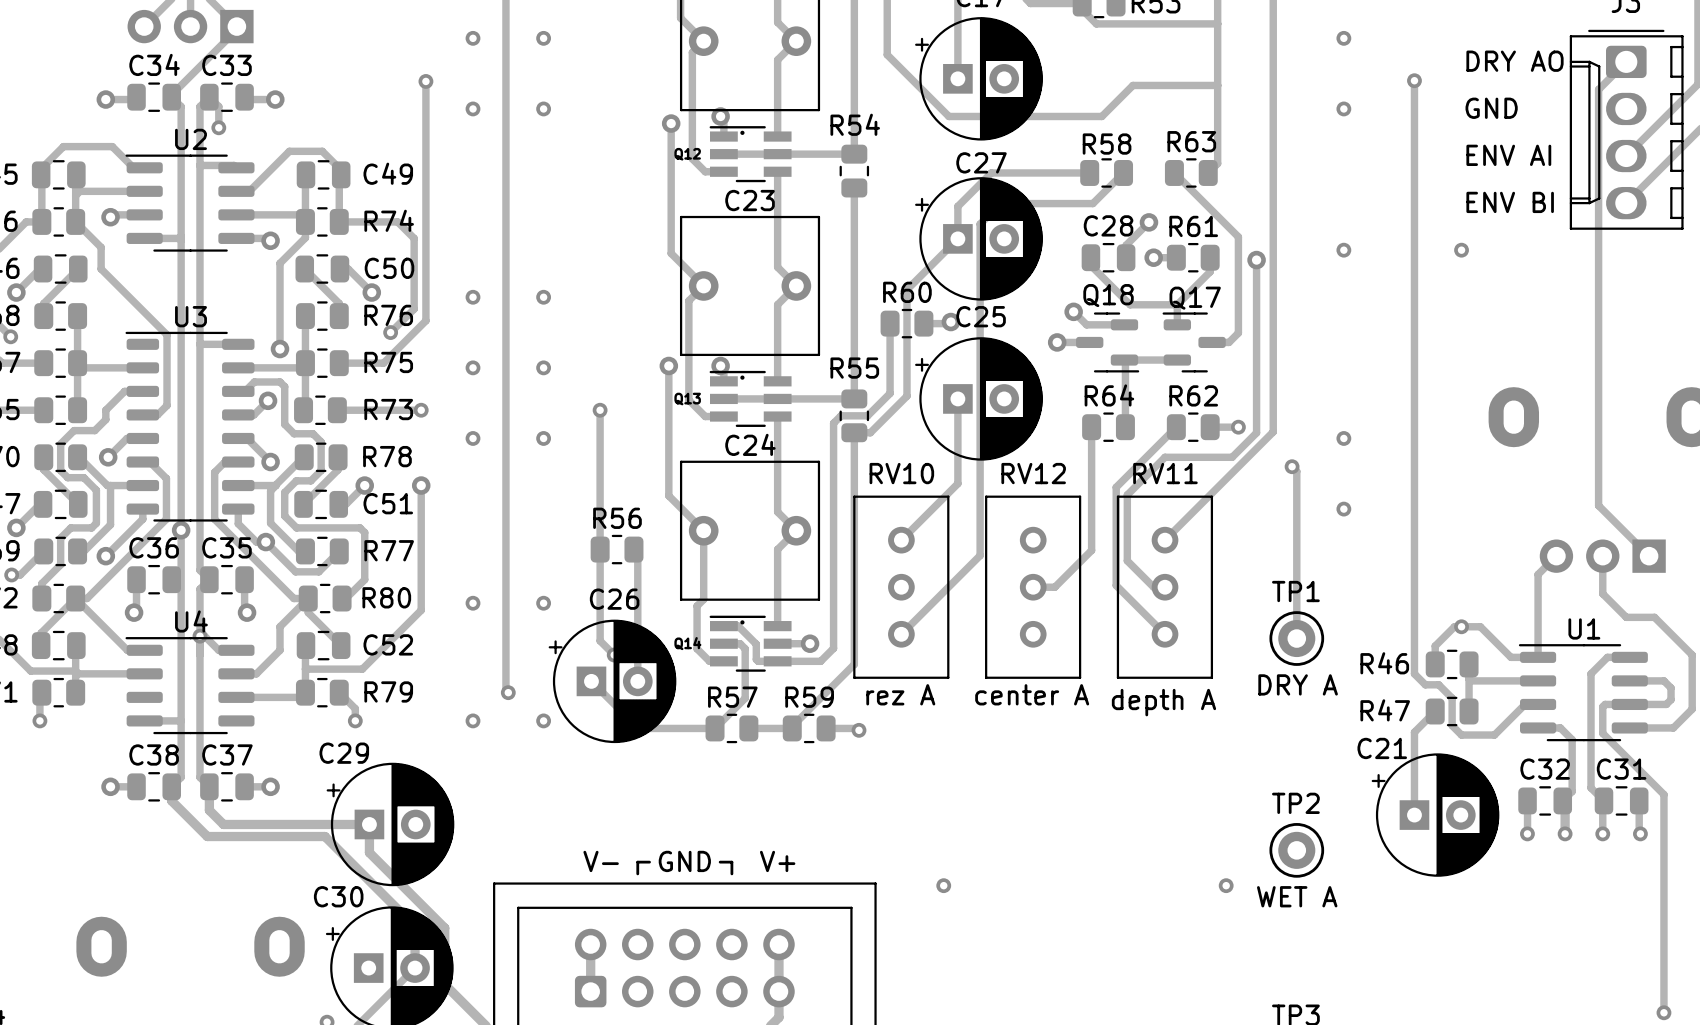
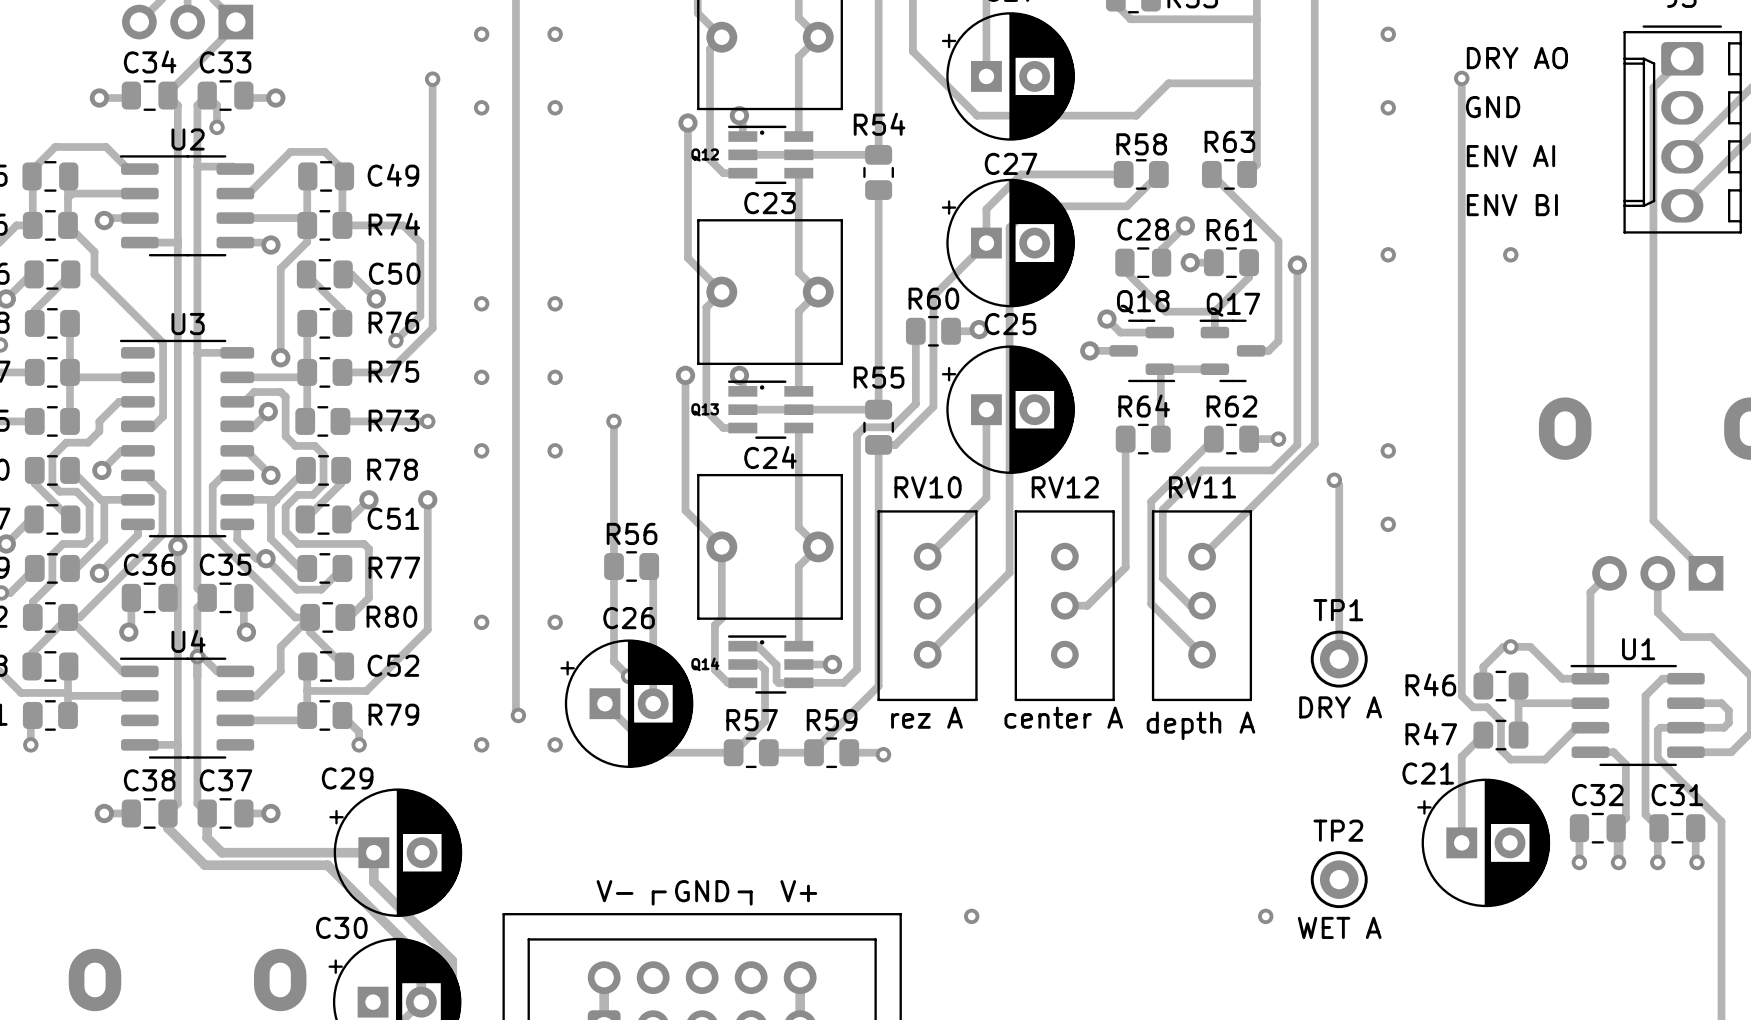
text position: DRY AO (1515, 61) -> DRY AO (1517, 58)
text position: GND (1491, 108) -> GND (1493, 107)
text position: ENV AI (1508, 155) -> ENV AI (1510, 156)
text position: ENV BI (1510, 202) -> ENV BI (1512, 205)

